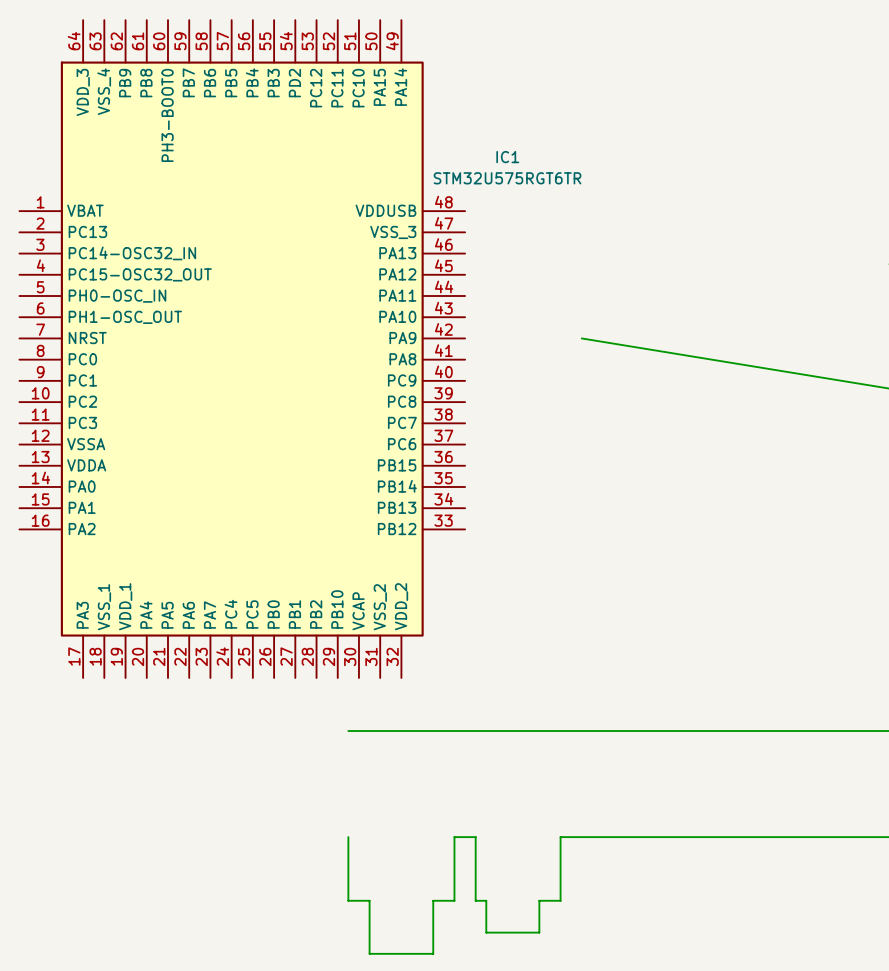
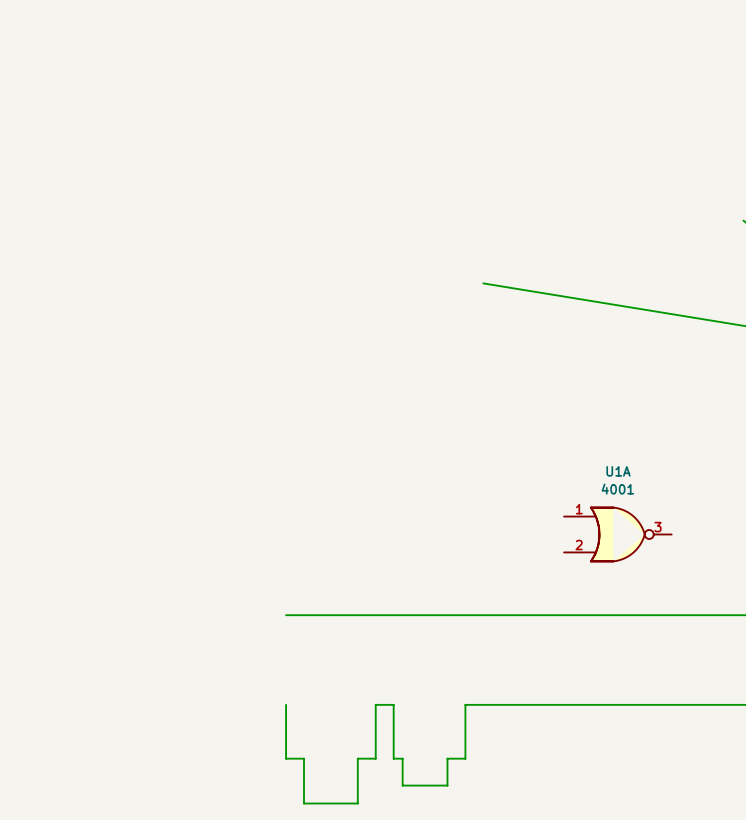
IC1: STM32U575RGT6TR (242, 349) -> none
U1A: none -> 4001 (617, 534)

